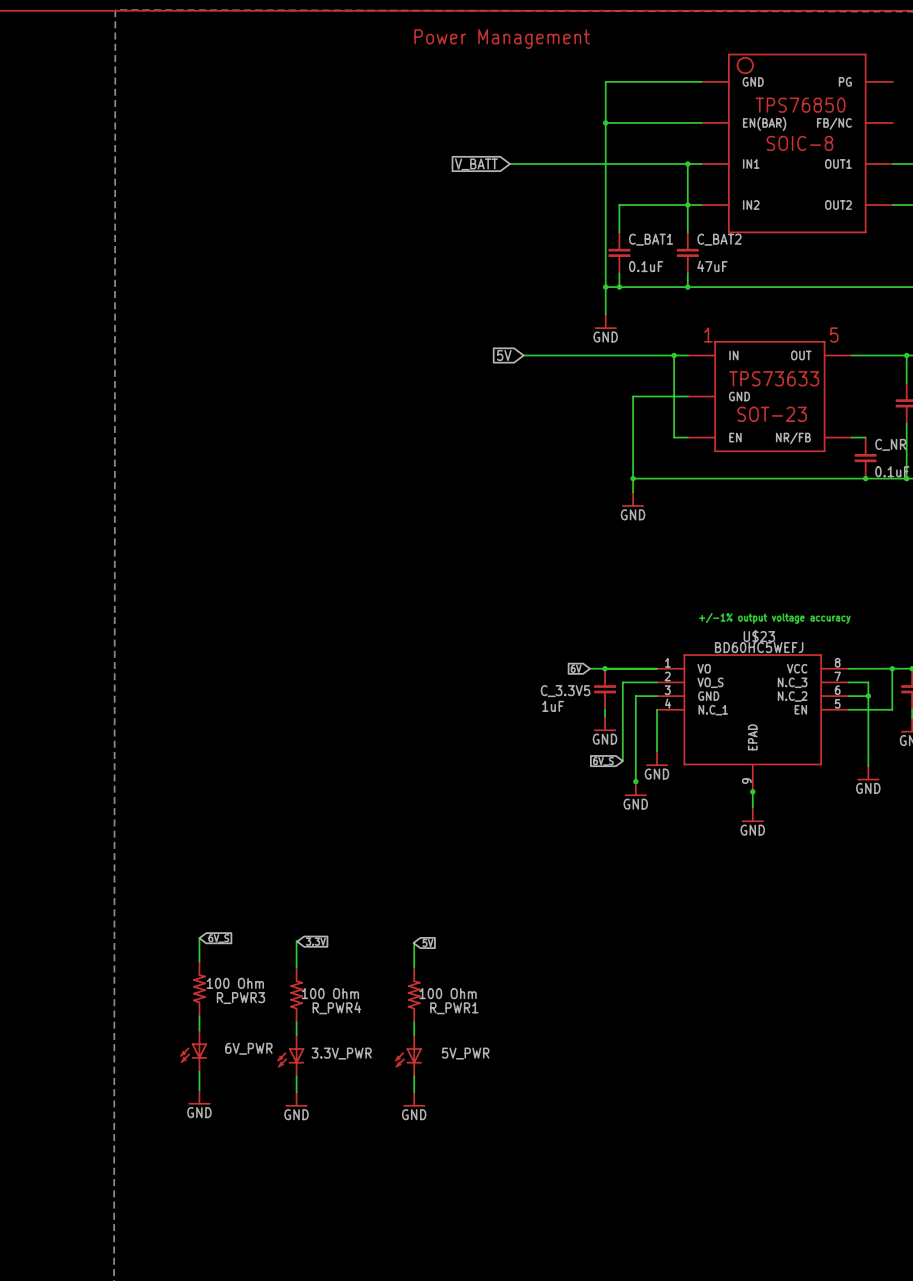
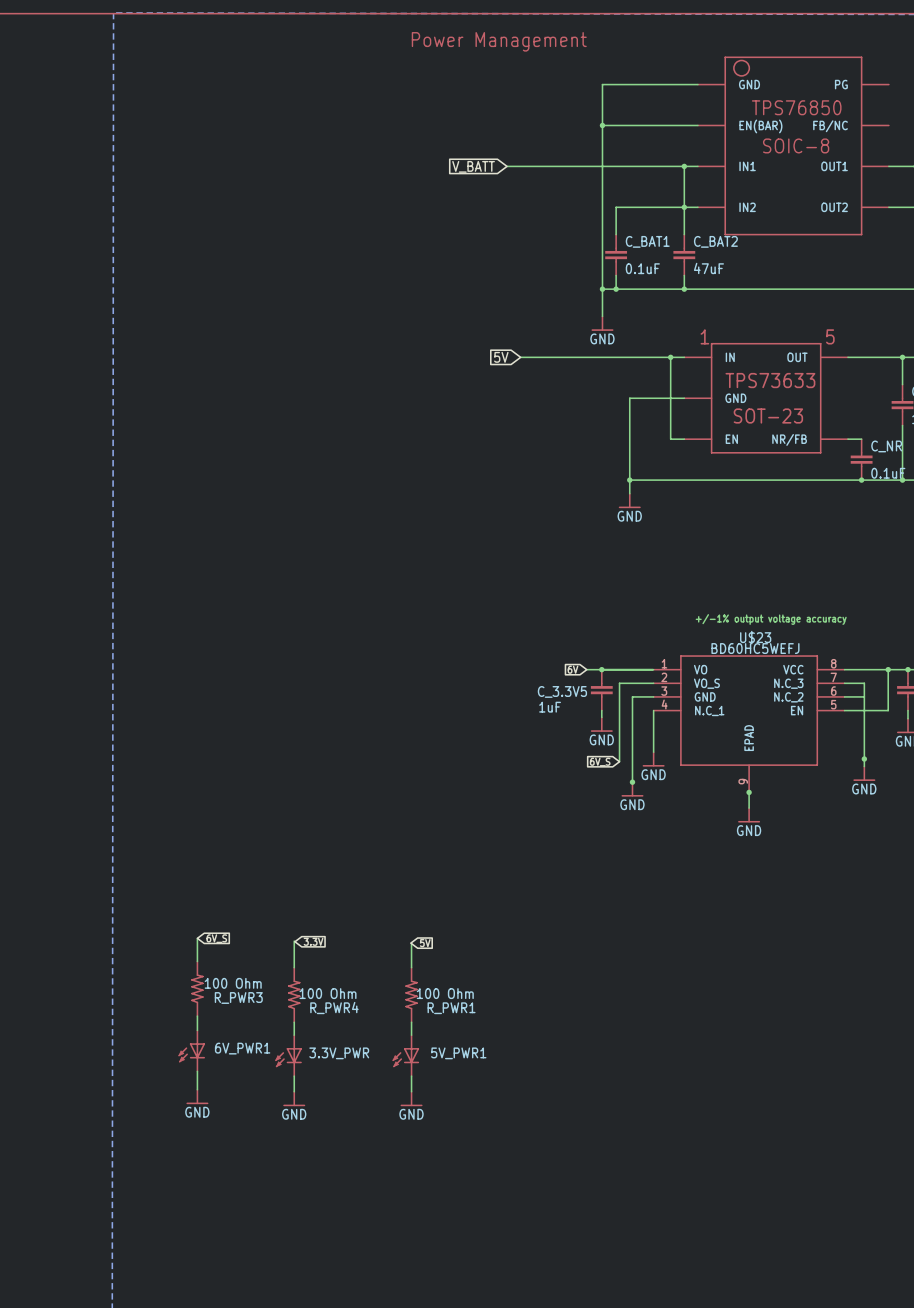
junction: (868, 696) -> none
junction: none -> (864, 759)
6V_PWR name: 6V_PWR (248, 1048) -> 6V_PWR1 (242, 1048)
5V_PWR name: 5V_PWR (465, 1053) -> 5V_PWR1 (458, 1053)

